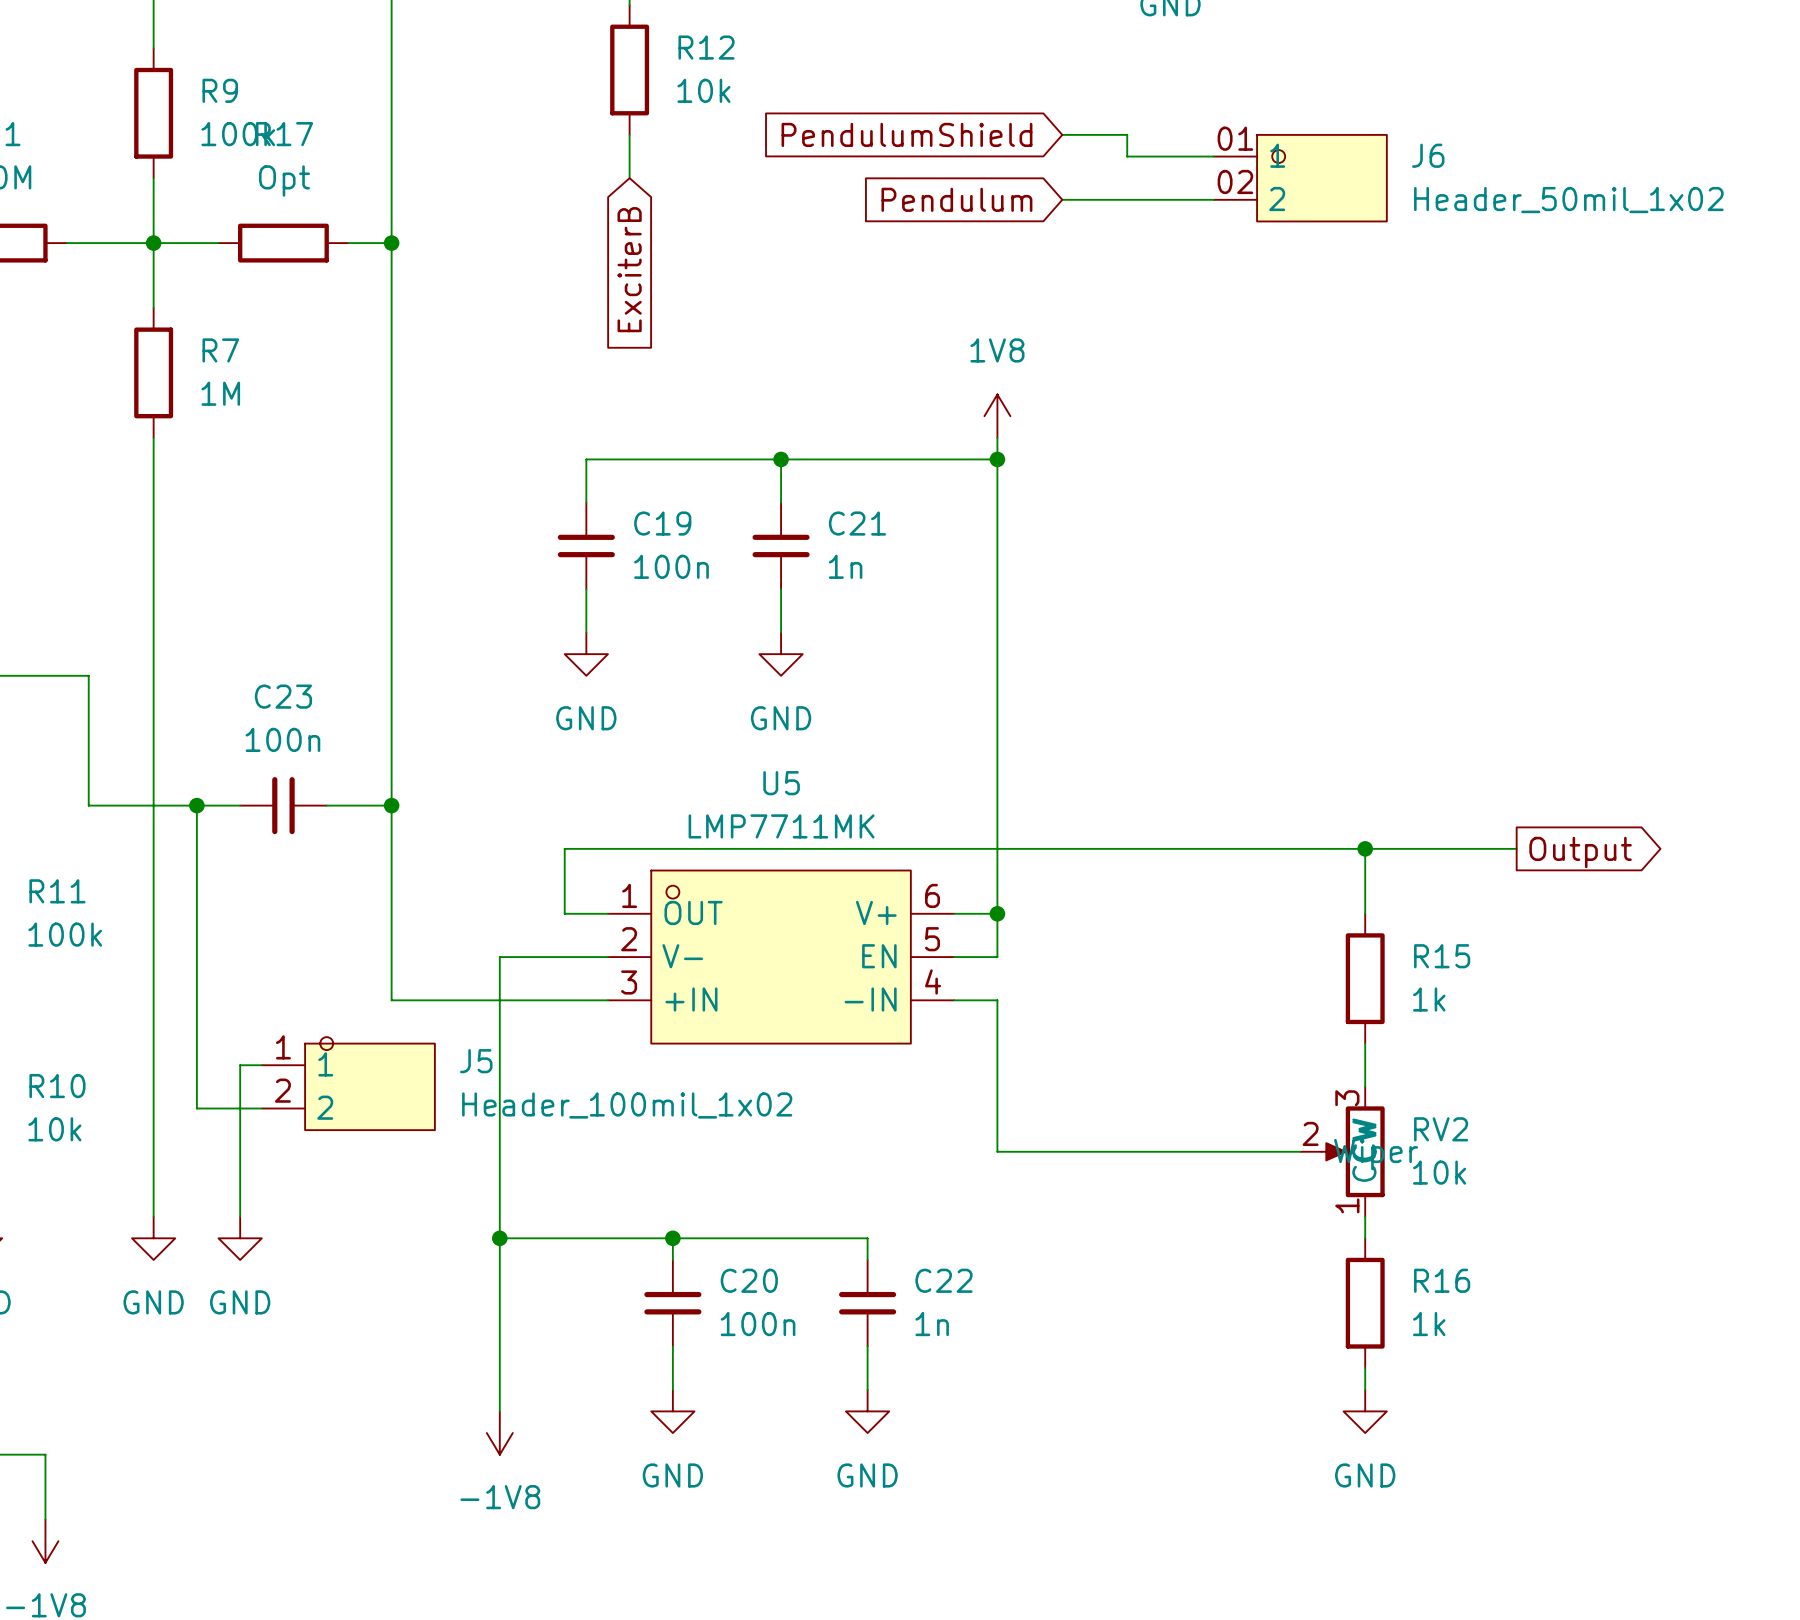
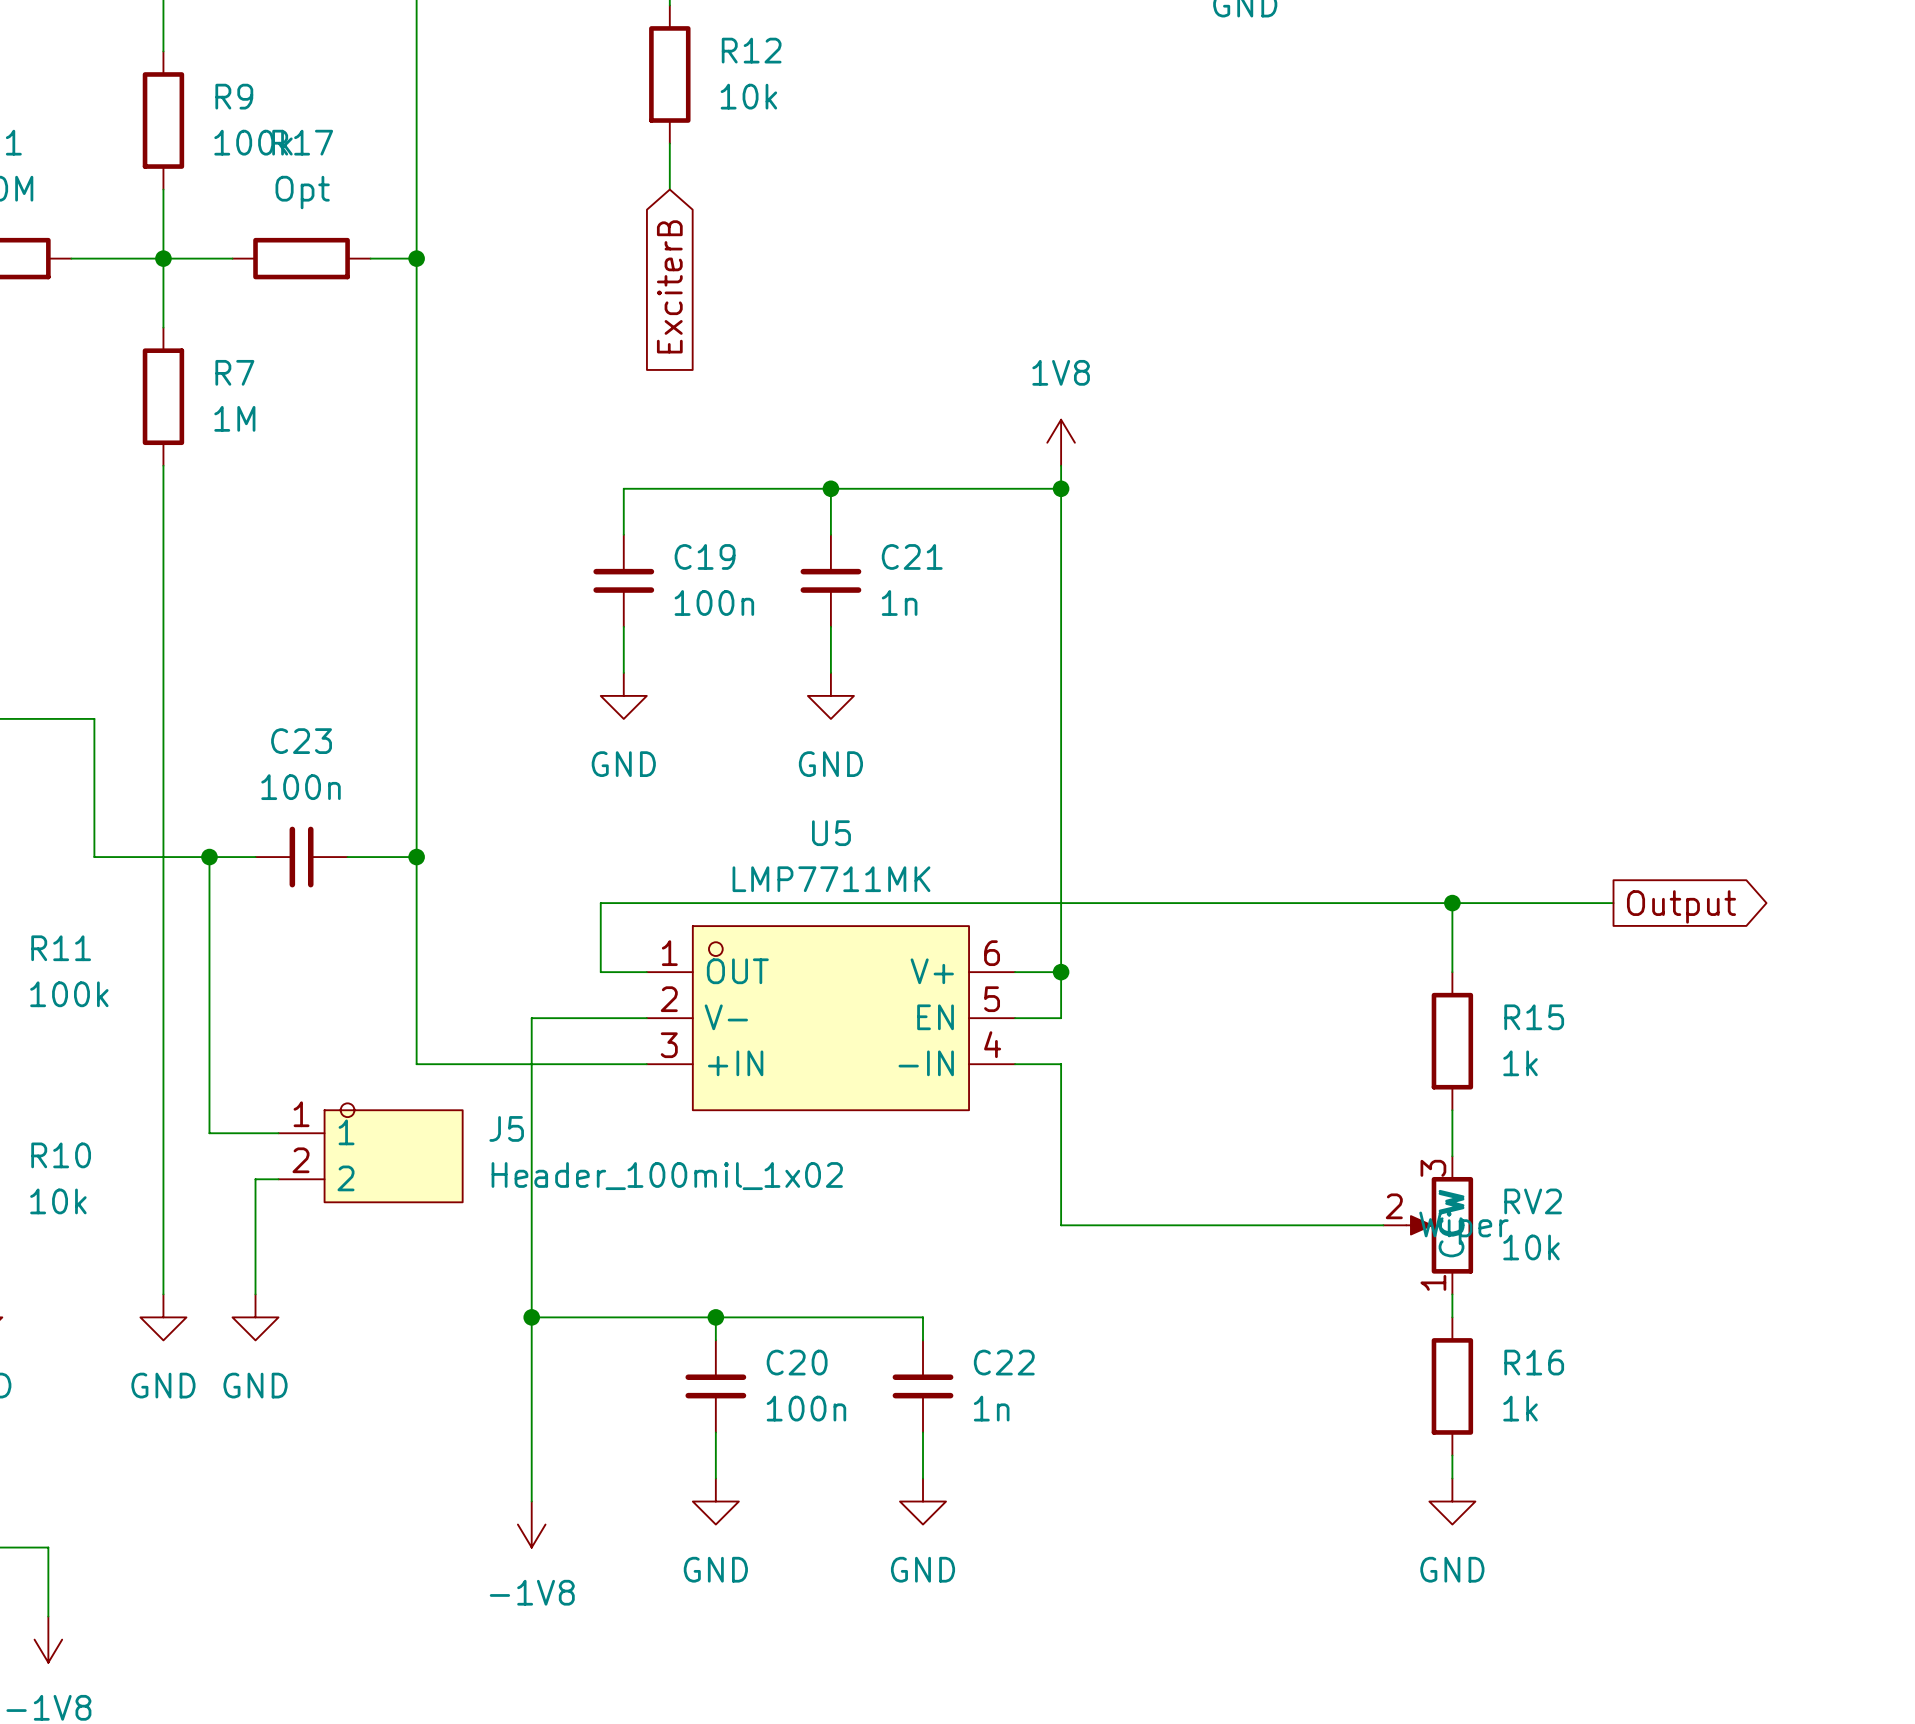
global label: PendulumShield (906, 134) -> none
wire: (1062, 134) (1127, 134) (1127, 156) (1213, 156) -> none
J6: Header_50mil_1x02 (1300, 178) -> none
global label: Pendulum (956, 199) -> none
wire: (1062, 199) (1213, 199) -> none
wire: (196, 1065) (196, 1108) (240, 1108) (240, 1065) -> (209, 1133) (255, 1133)

